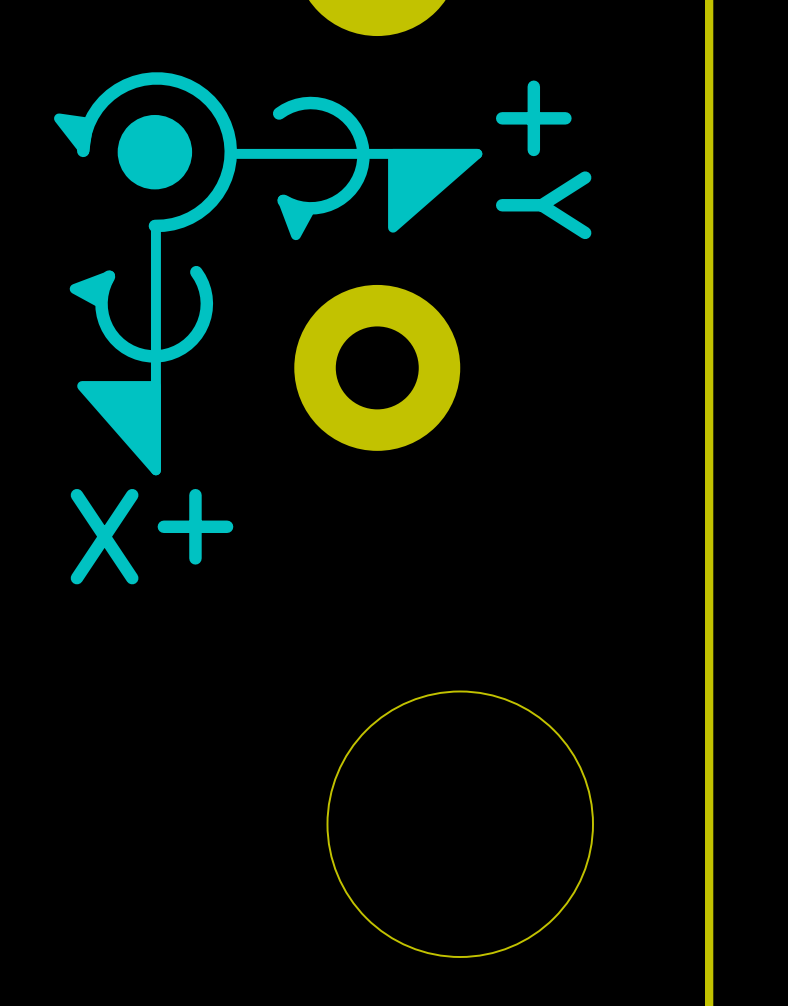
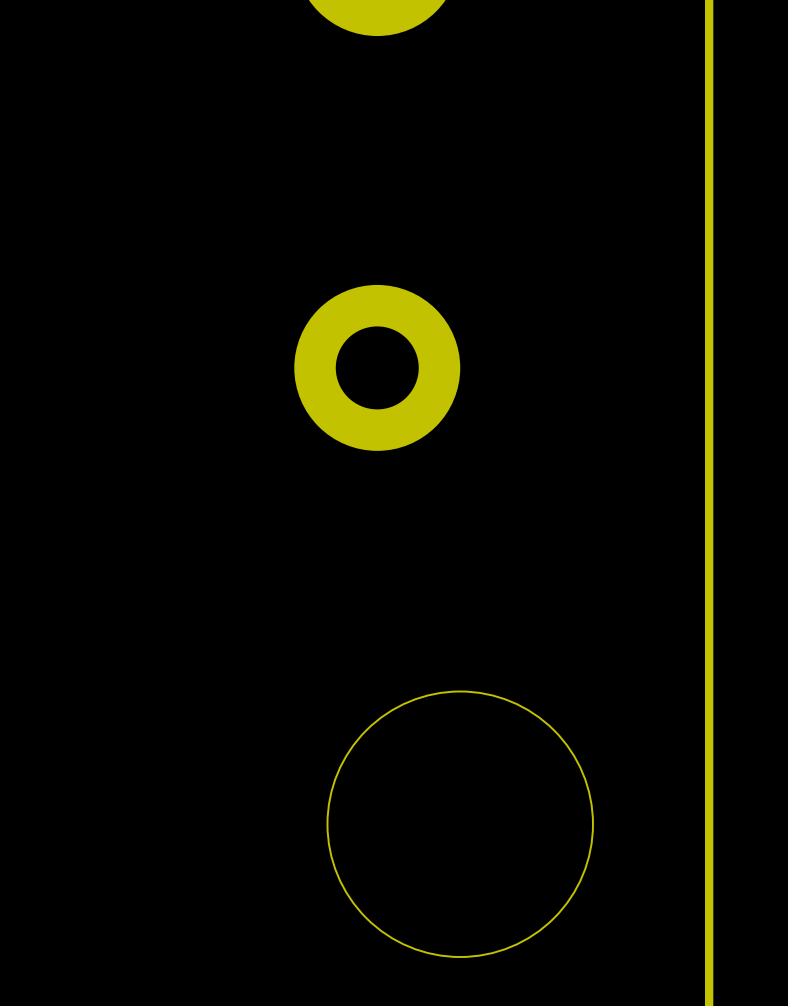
drawing: [54, 72, 483, 476] -> none

